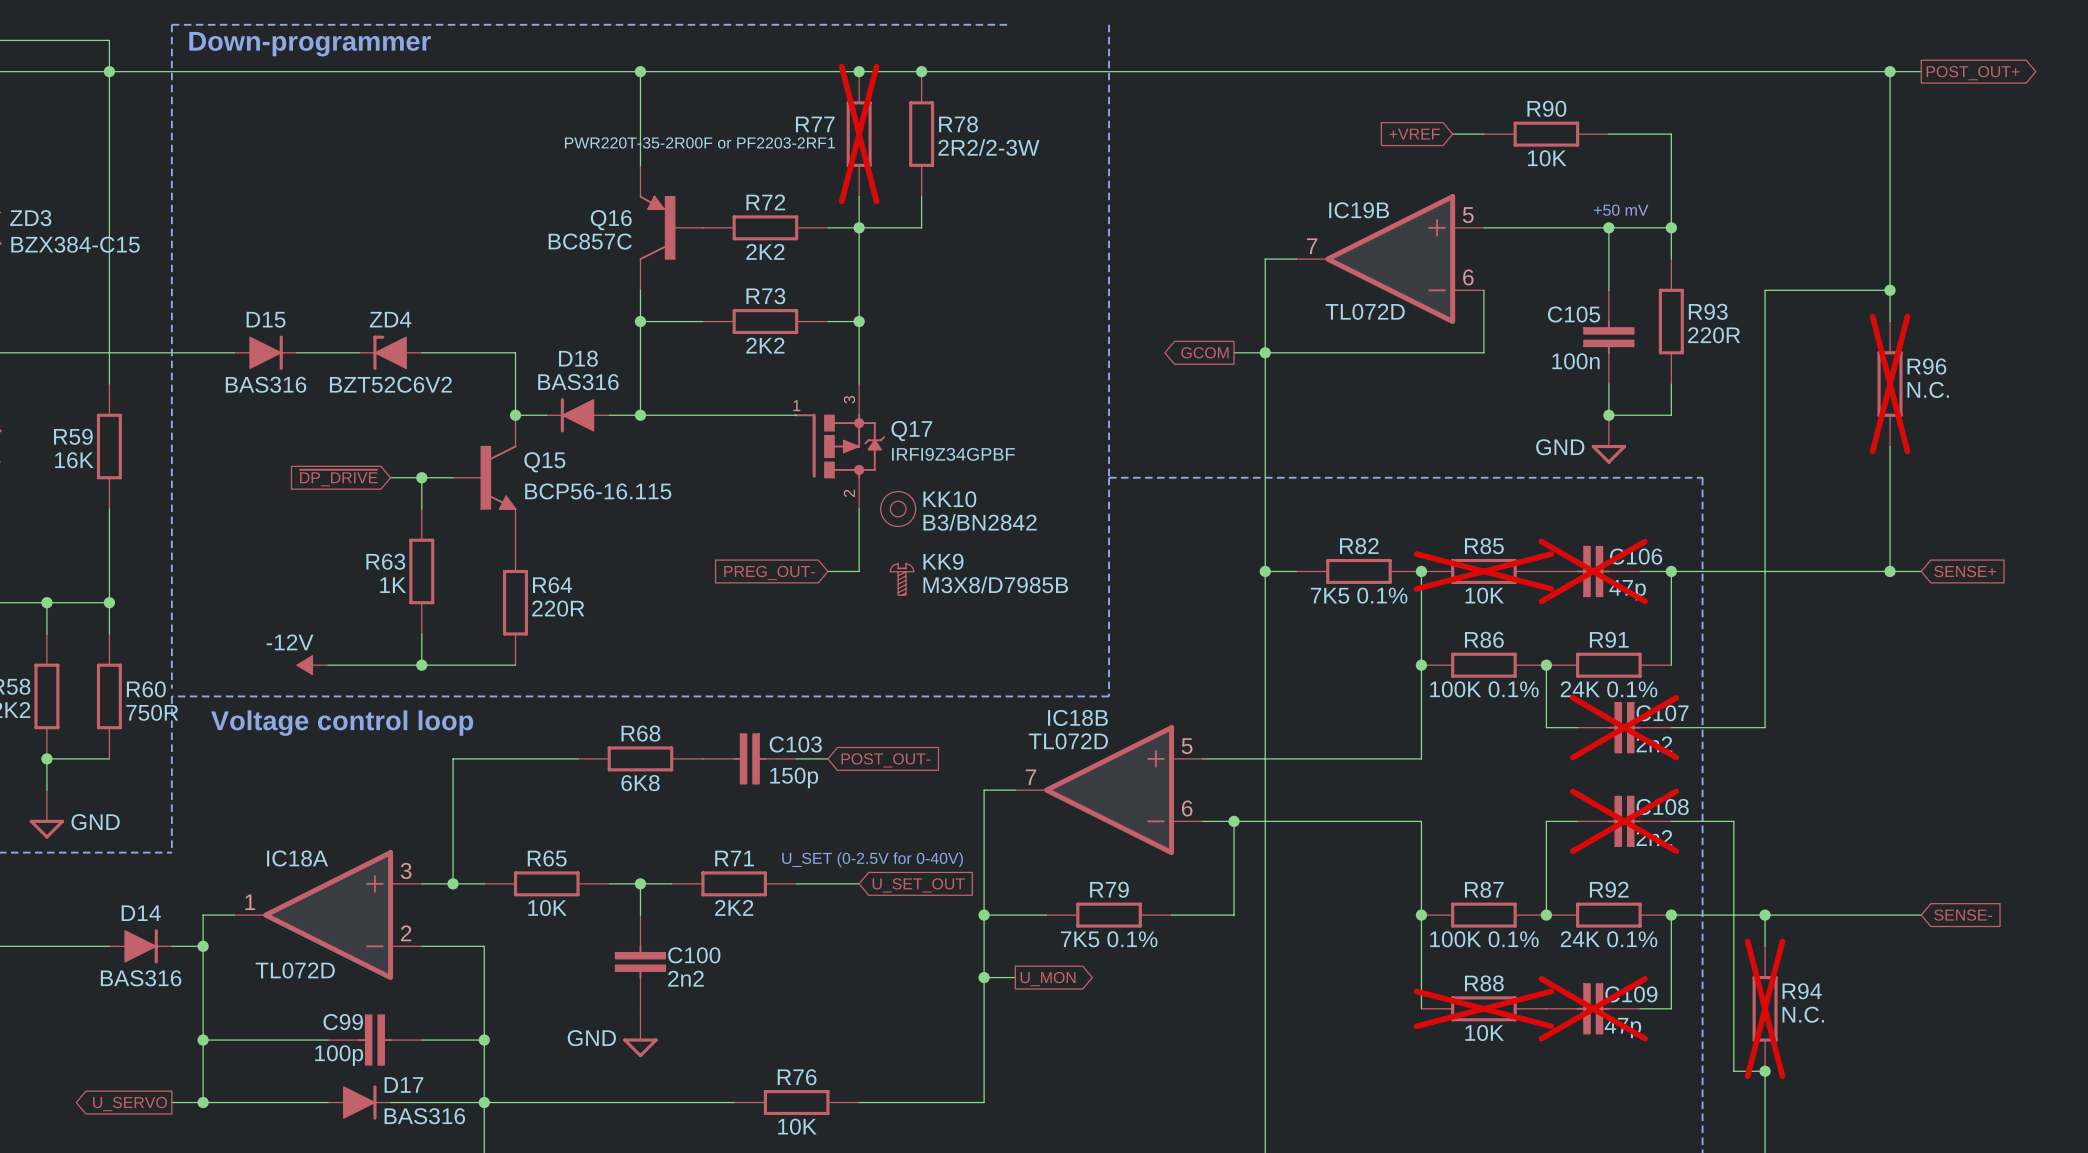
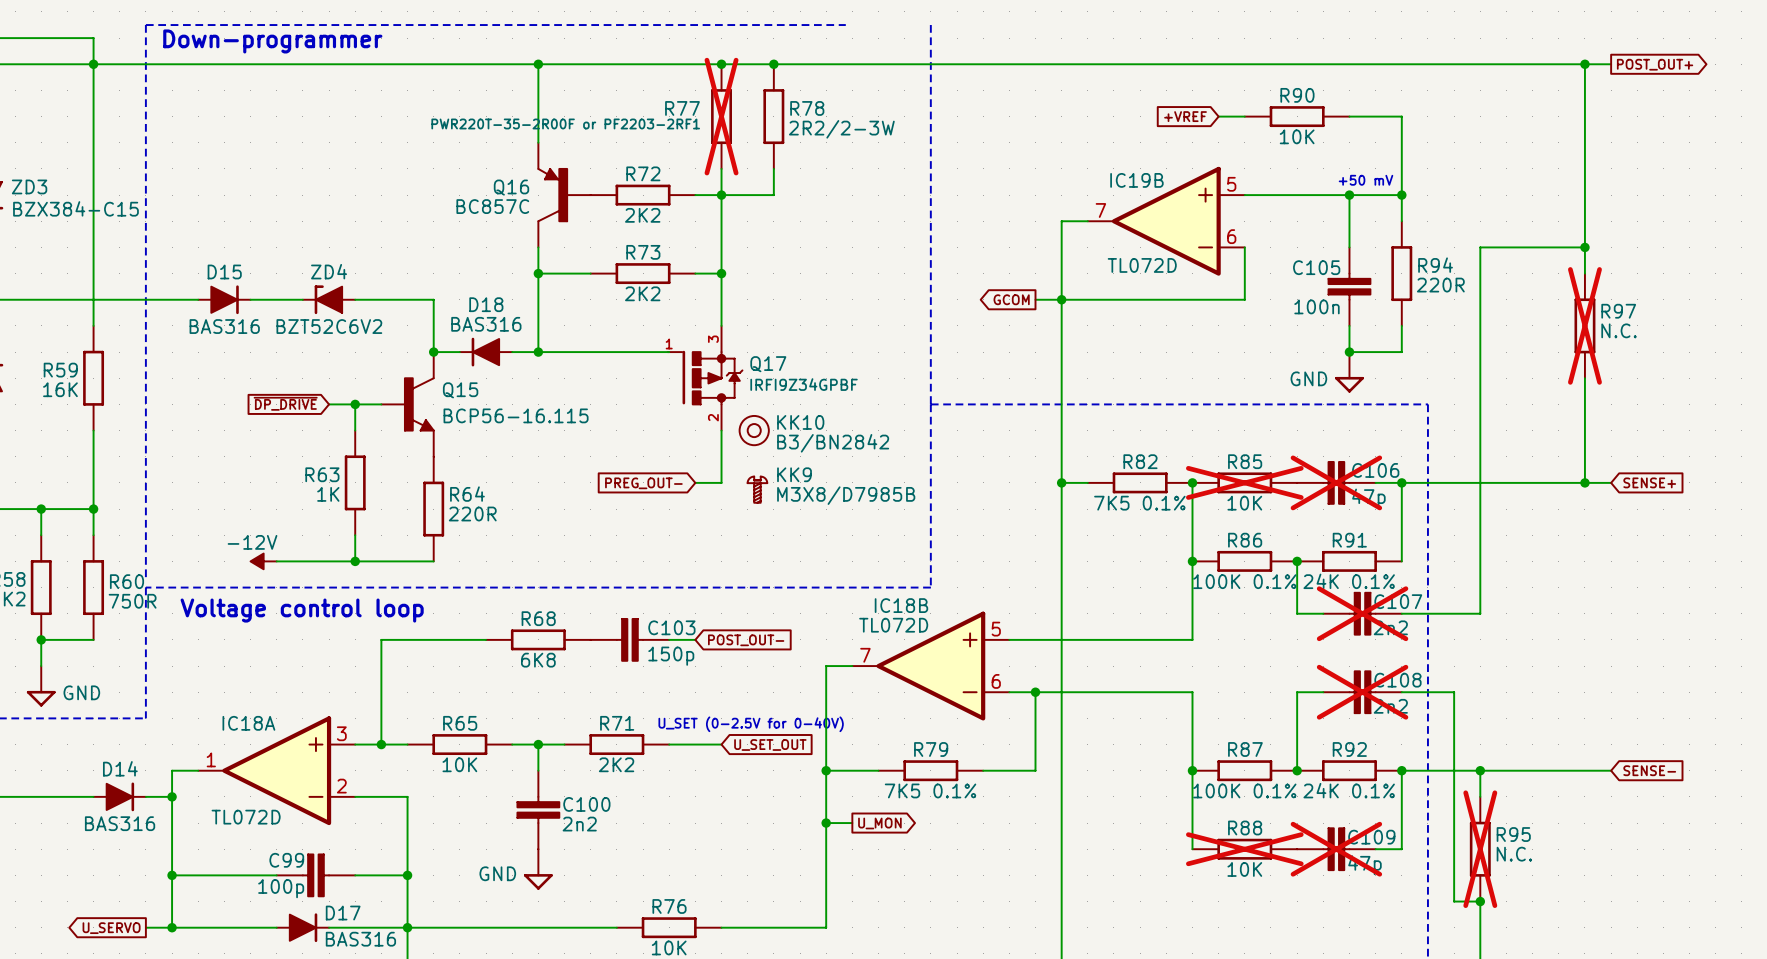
R93 name: R93 (1708, 311) -> R94 (1435, 265)
R96 name: R96 (1926, 366) -> R97 (1618, 311)
R94 name: R94 (1802, 991) -> R95 (1513, 834)

